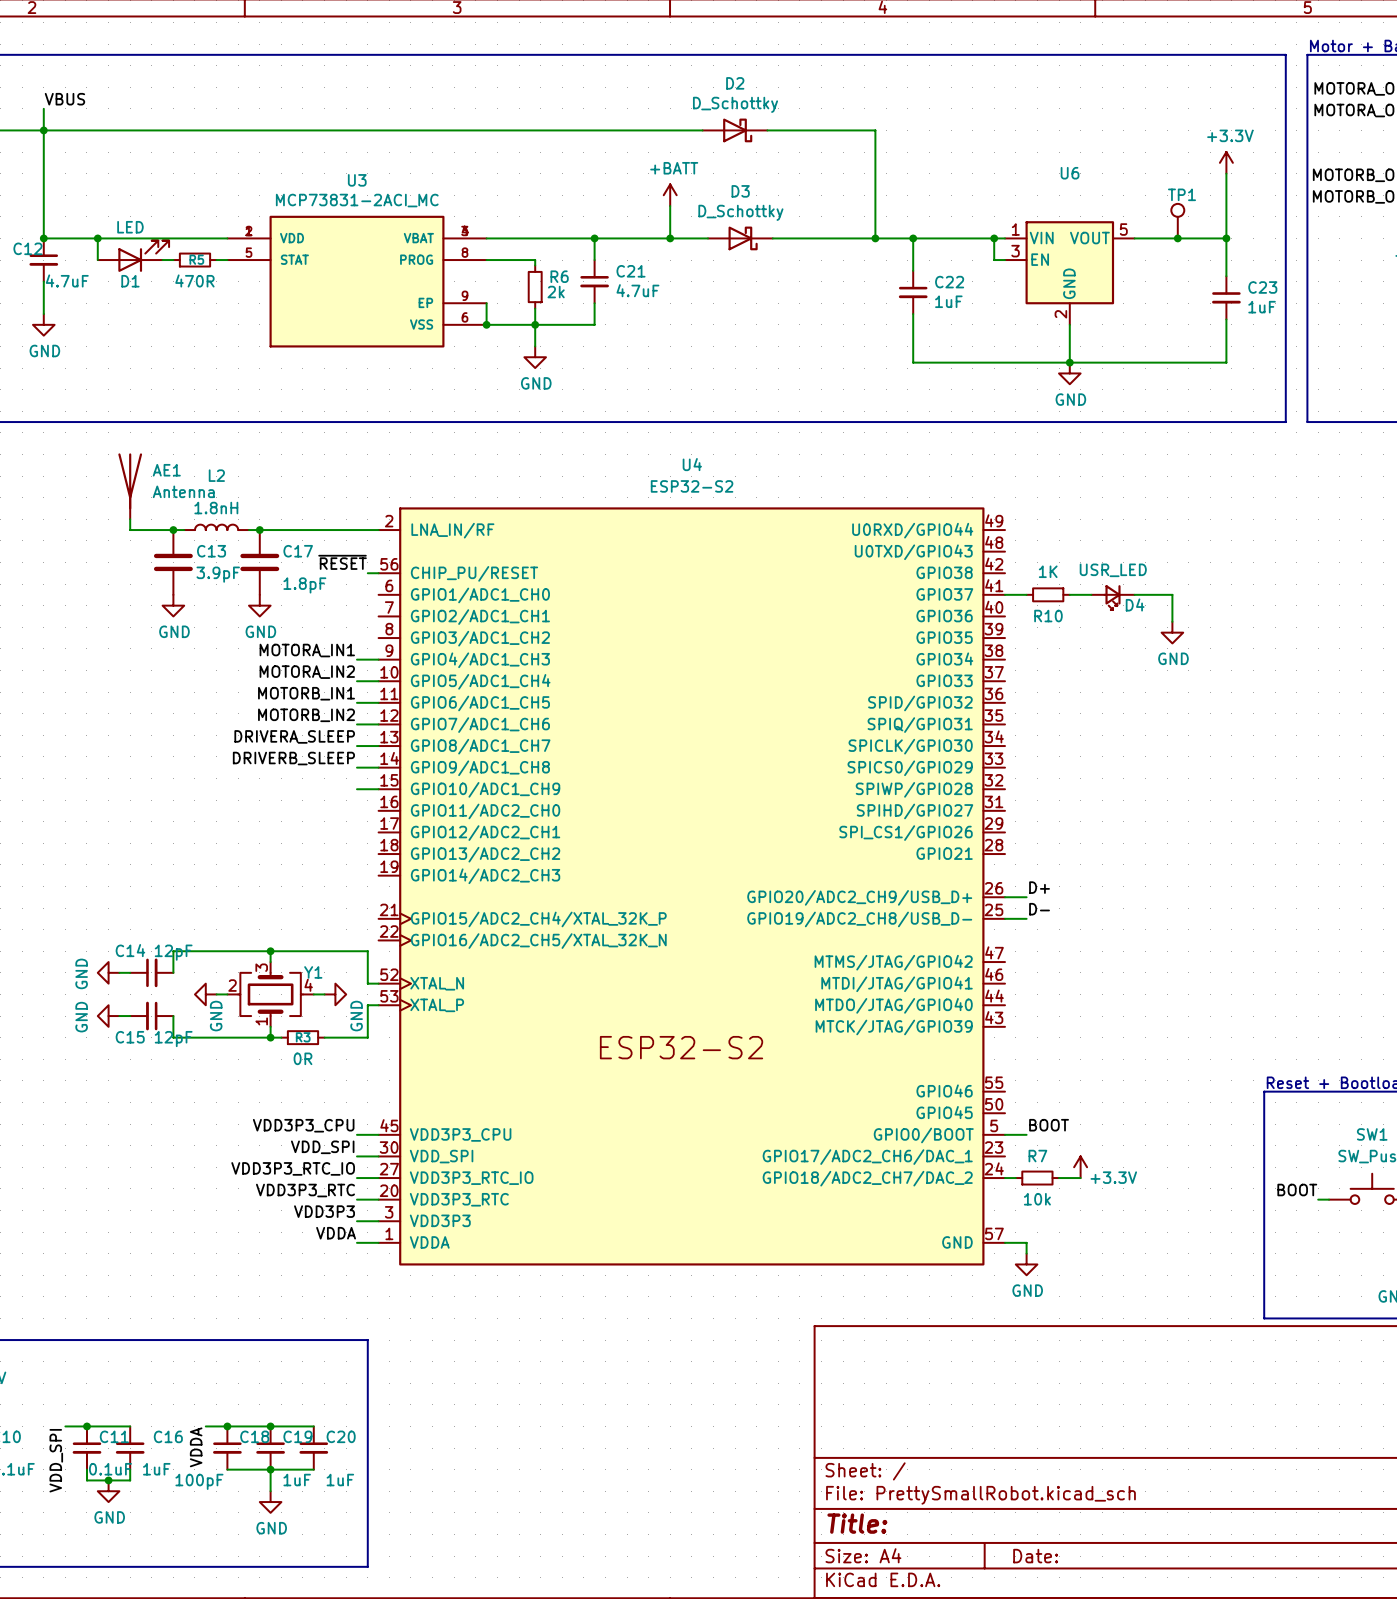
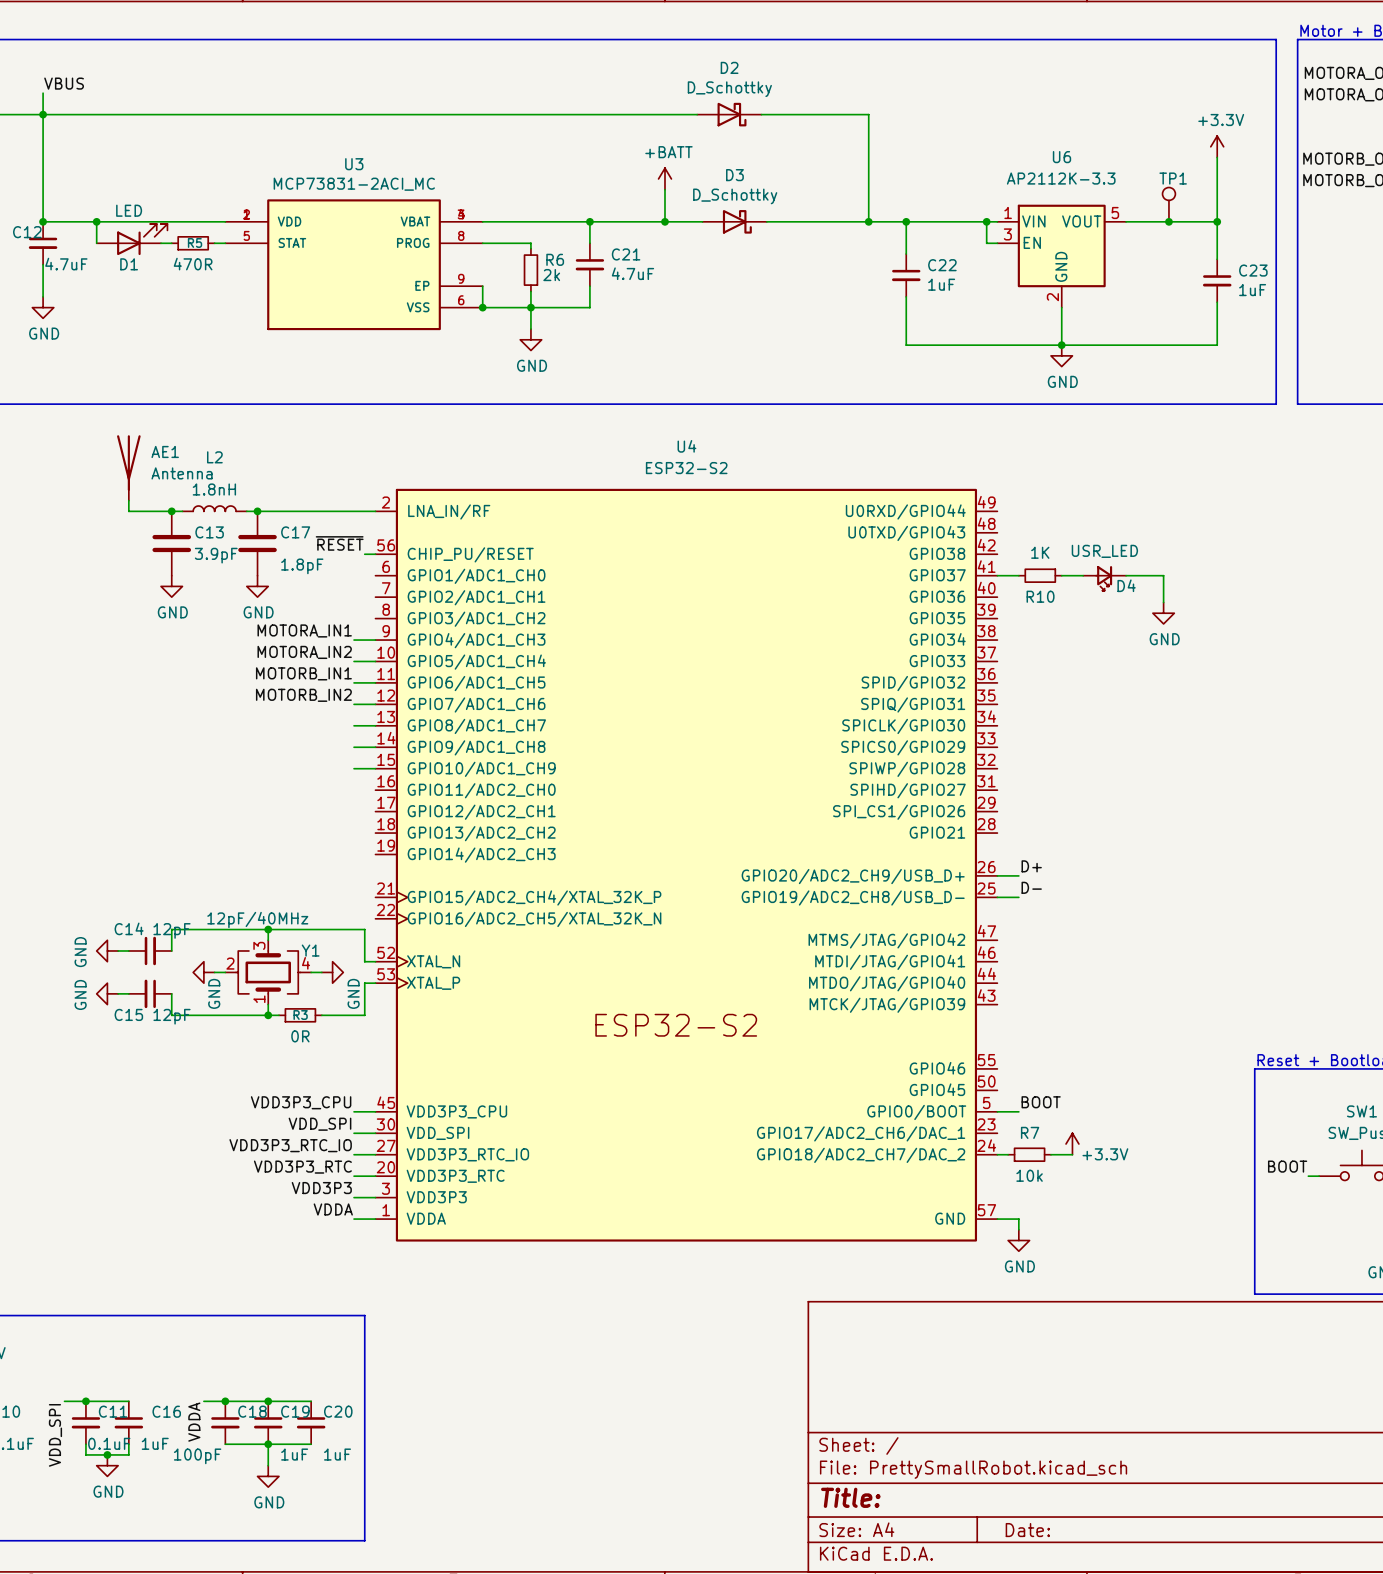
U6 value: none -> AP2112K-3.3 (1061, 178)
label: DRIVERA_SLEEP (294, 736) -> none
label: DRIVERB_SLEEP (293, 758) -> none
Y1 value: none -> 12pF/40MHz (257, 919)

